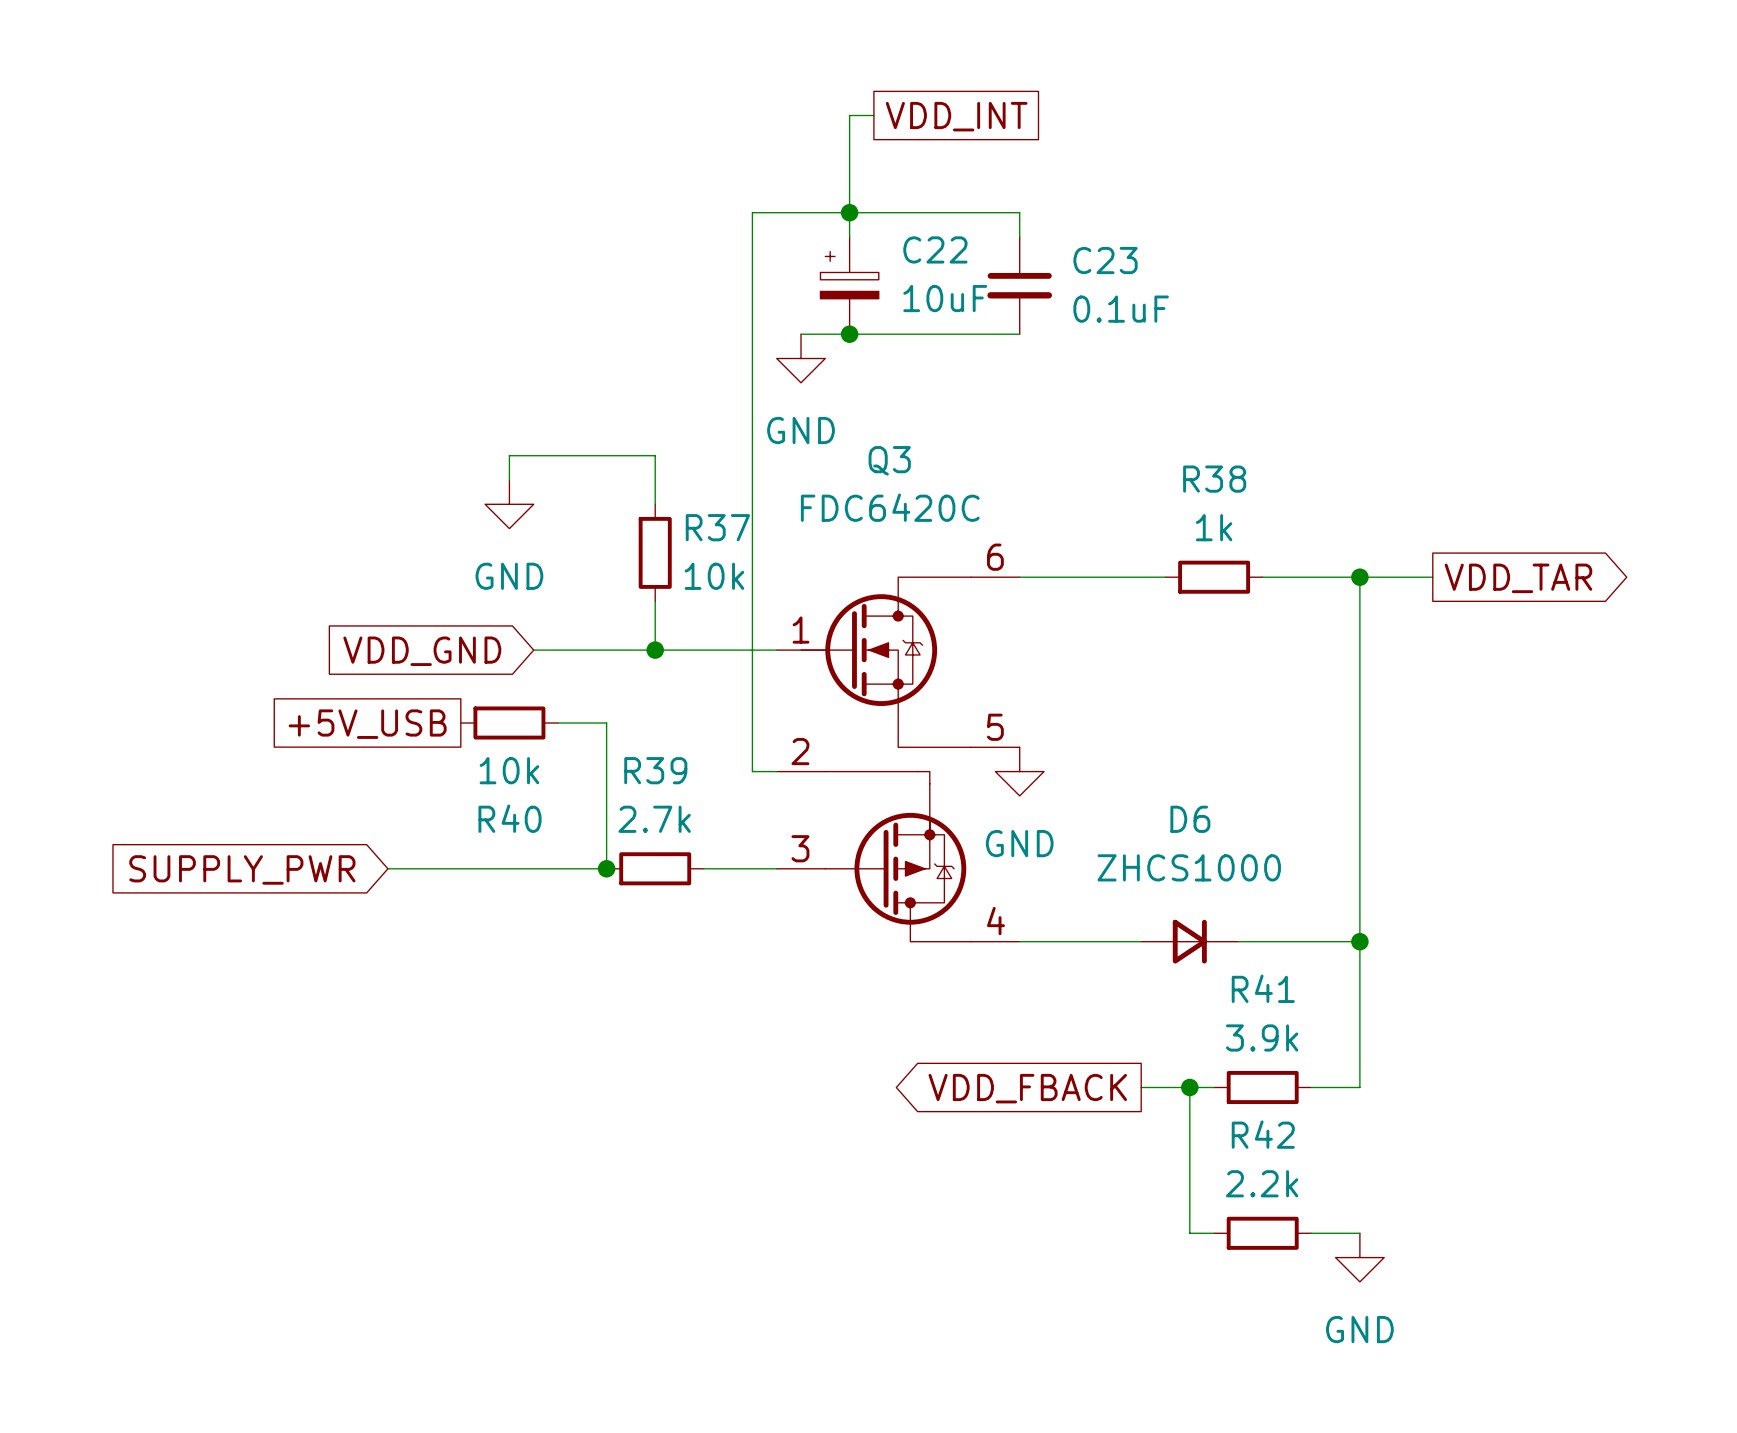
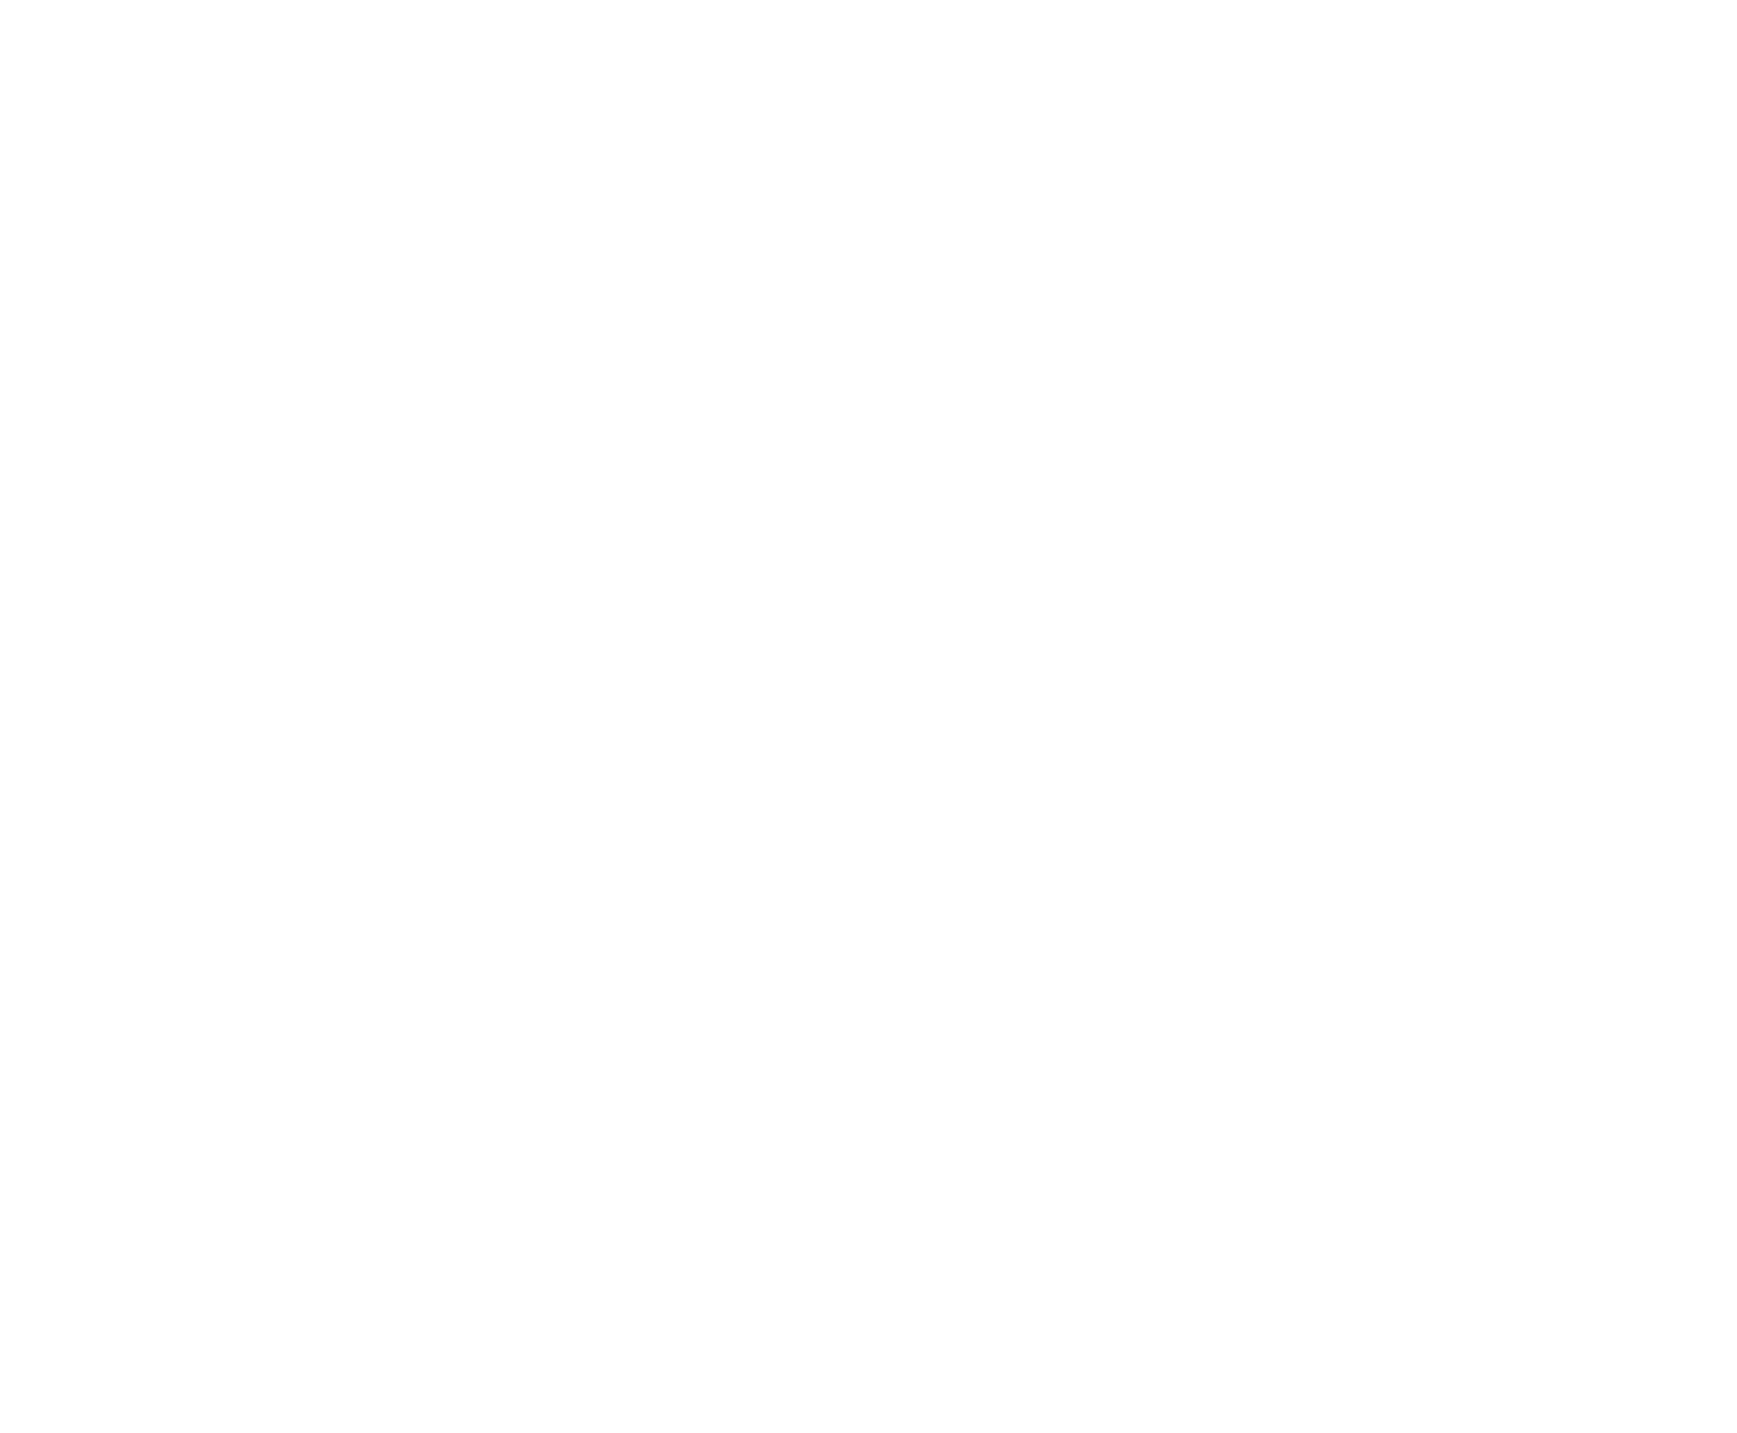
wire: (873, 115) (849, 115) (849, 237) -> none
global label: VDD_INT (956, 116) -> none
junction: (849, 212) -> none
wire: (1019, 237) (1019, 212) (752, 212) (752, 771) (776, 771) -> none
C22: 10uF (849, 285) -> none
C23: 0.1uF (1019, 285) -> none
wire: (801, 334) (1019, 334) -> none
junction: (849, 334) -> none
power symbol: GND (801, 358) -> none
wire: (509, 480) (509, 455) (655, 455) (655, 504) -> none
power symbol: GND (509, 504) -> none
R37: 10k (655, 552) -> none
wire: (1019, 577) (1165, 577) -> none
R38: 1k (1214, 577) -> none
wire: (1262, 577) (1432, 577) -> none
wire: (1359, 577) (1359, 1087) (1311, 1087) -> none
junction: (1359, 577) -> none
global label: VDD_TAR (1518, 578) -> none
wire: (655, 601) (655, 650) -> none
wire: (533, 650) (776, 650) -> none
junction: (655, 650) -> none
global label: VDD_GND (422, 651) -> none
R40: 10k (509, 723) -> none
wire: (558, 723) (606, 723) (606, 868) (387, 868) -> none
global label: +5V_USB (367, 724) -> none
Q3: FDC6420C (898, 759) -> none
power symbol: GND (1019, 771) -> none
junction: (606, 868) -> none
R39: 2.7k (655, 868) -> none
wire: (703, 868) (776, 868) -> none
global label: SUPPLY_PWR (242, 869) -> none
wire: (1019, 941) (1141, 941) -> none
D6: ZHCS1000 (1189, 941) -> none
wire: (1238, 941) (1359, 941) -> none
junction: (1359, 941) -> none
wire: (1141, 1087) (1214, 1087) -> none
wire: (1189, 1087) (1189, 1233) (1214, 1233) -> none
junction: (1189, 1087) -> none
R41: 3.9k (1262, 1087) -> none
global label: VDD_FBACK (1027, 1088) -> none
R42: 2.2k (1262, 1233) -> none
wire: (1311, 1233) (1359, 1233) -> none
power symbol: GND (1359, 1257) -> none

